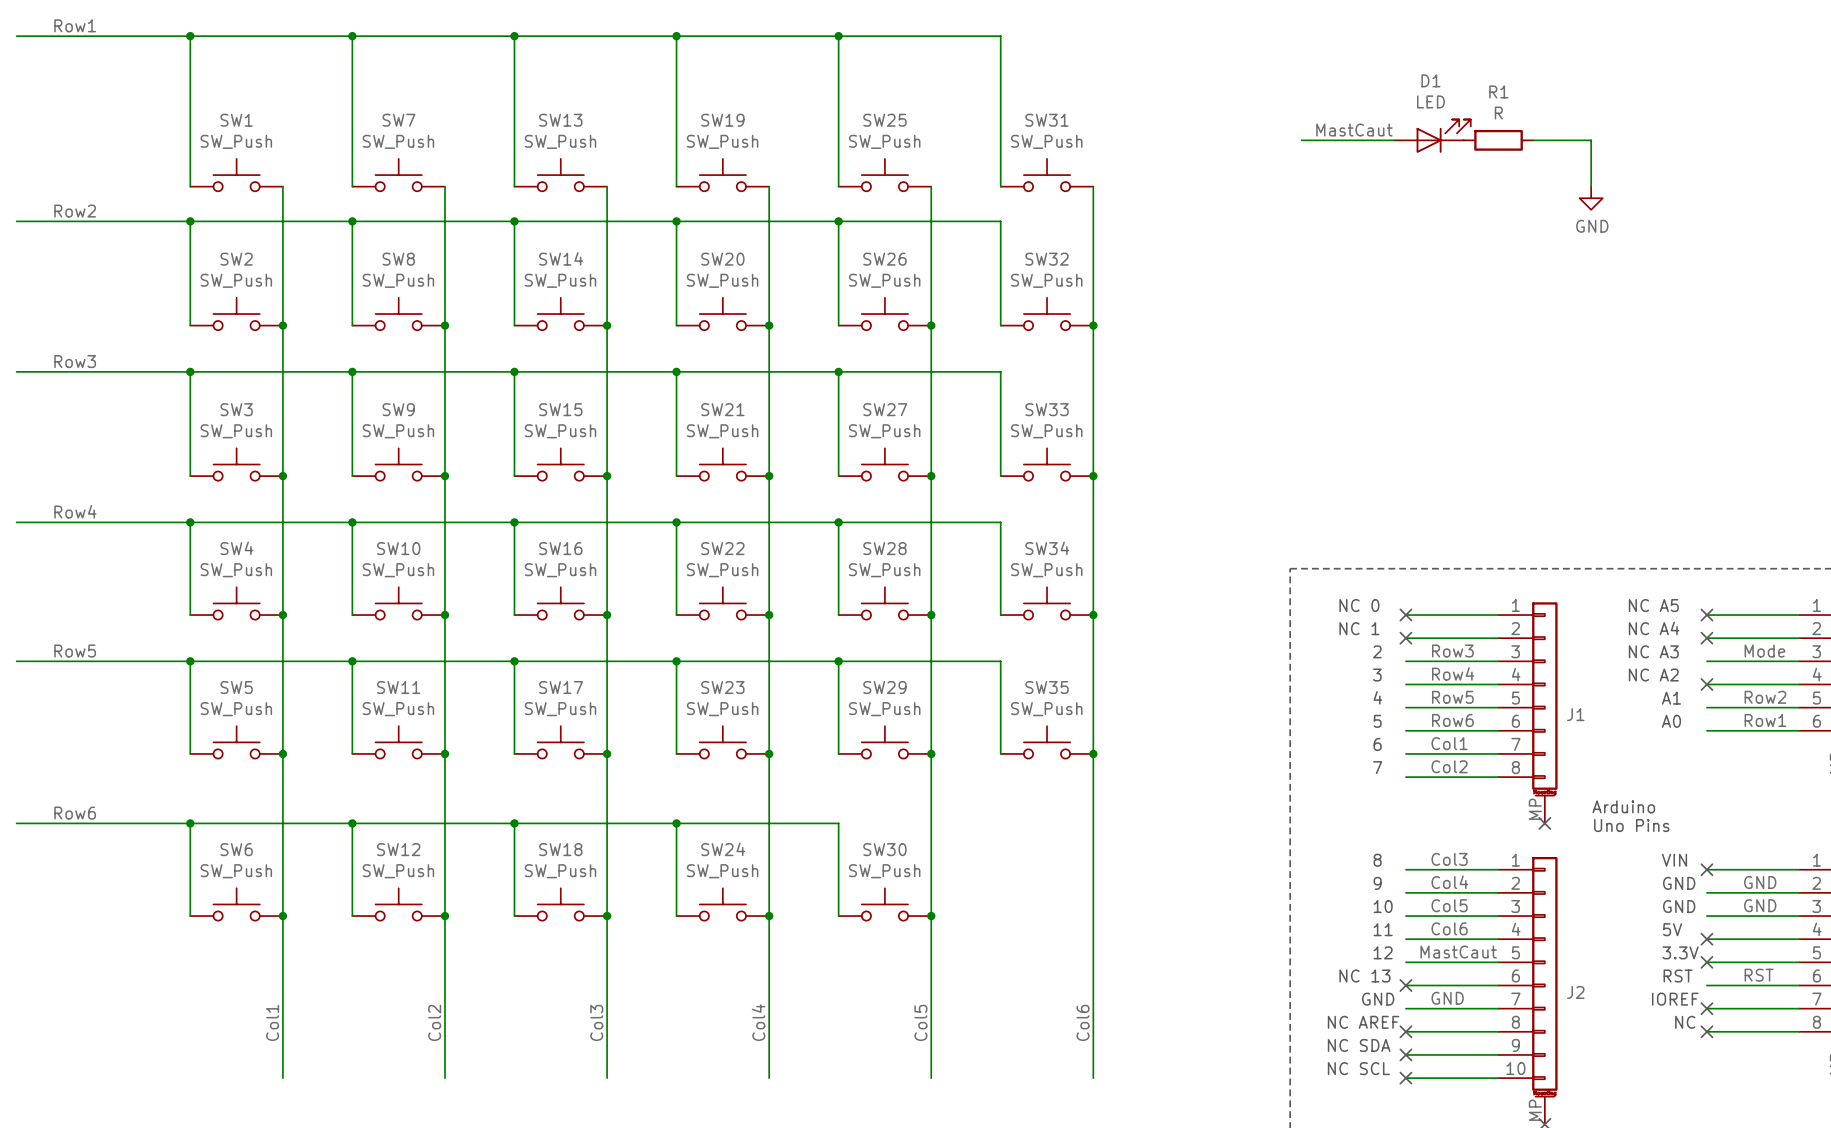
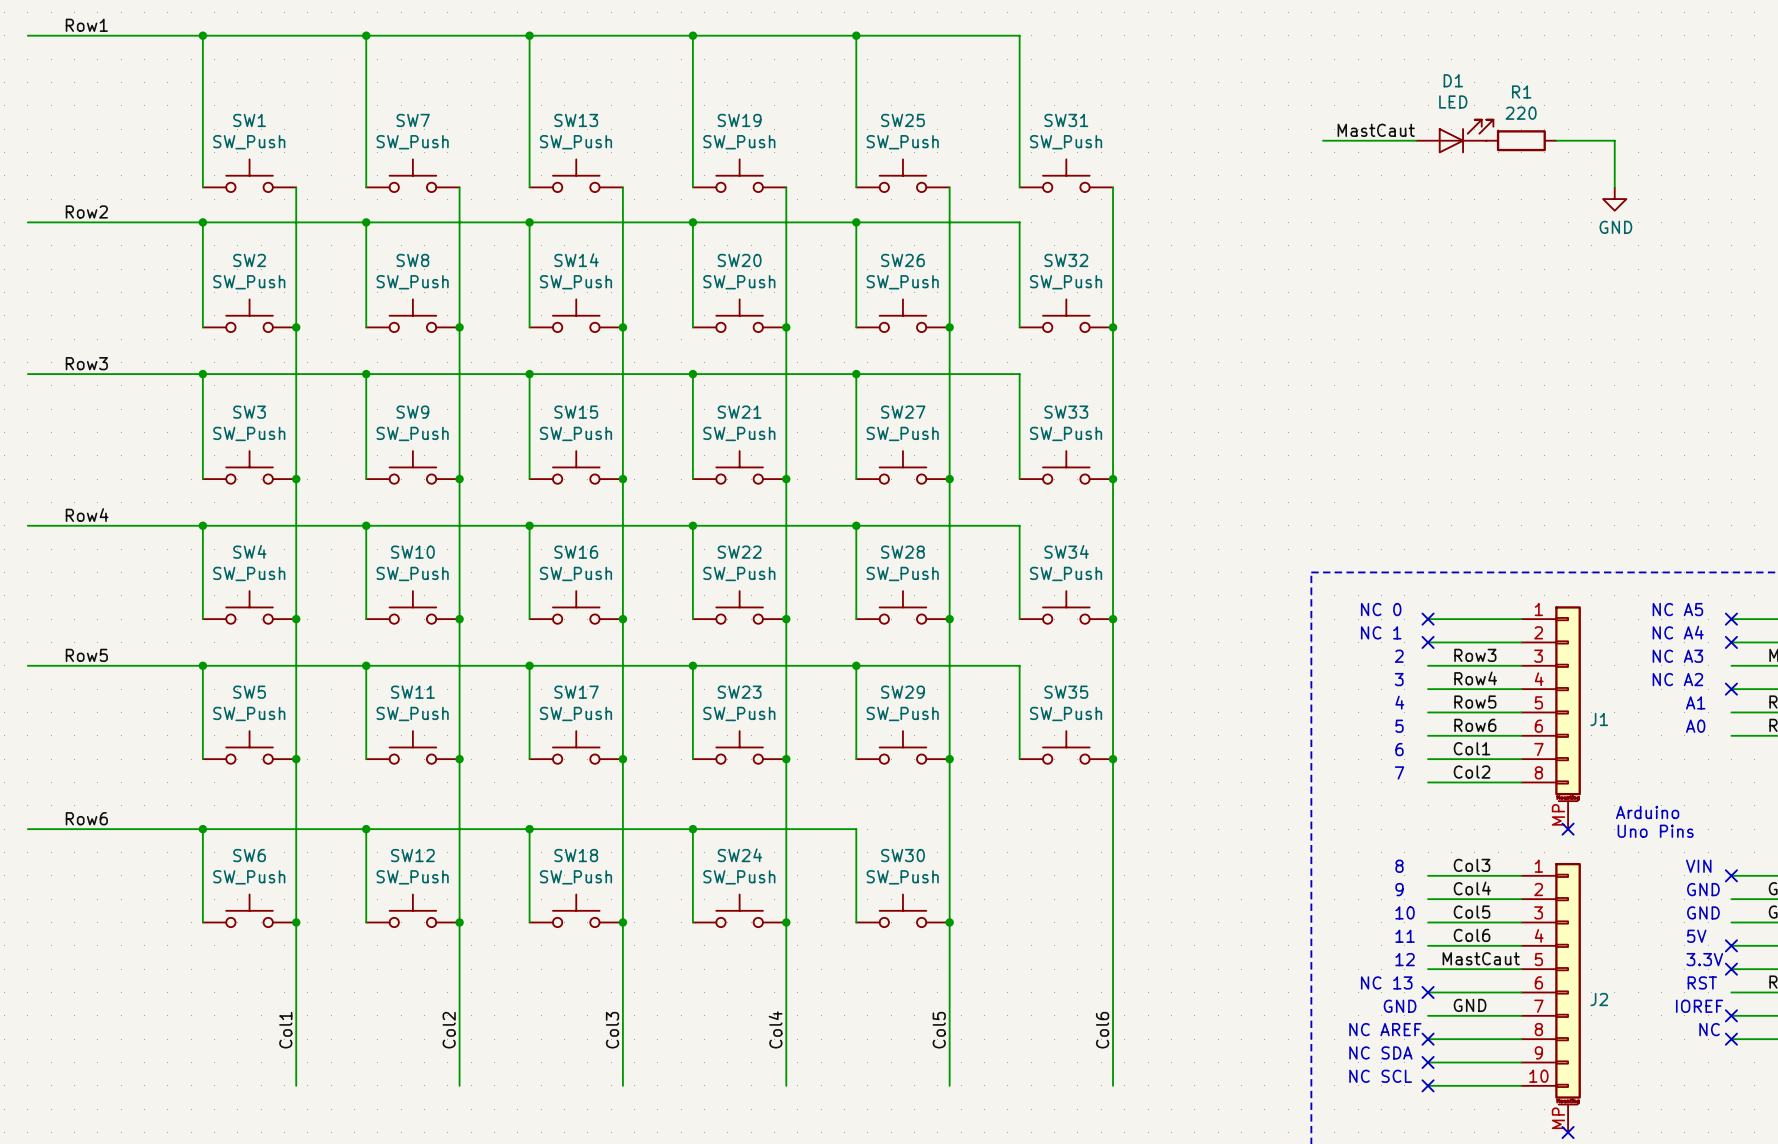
R1 value: R (1498, 113) -> 220 (1521, 113)

